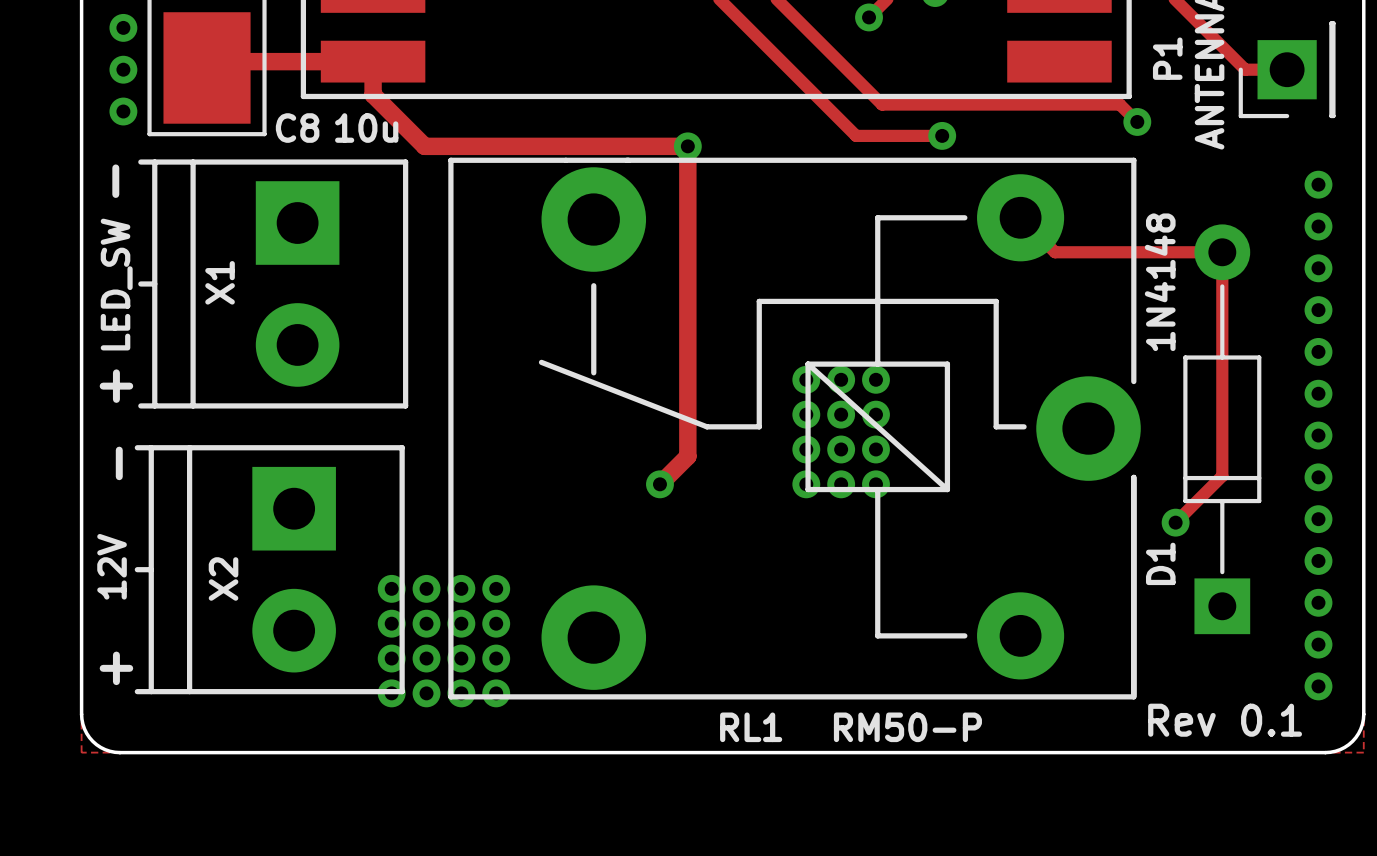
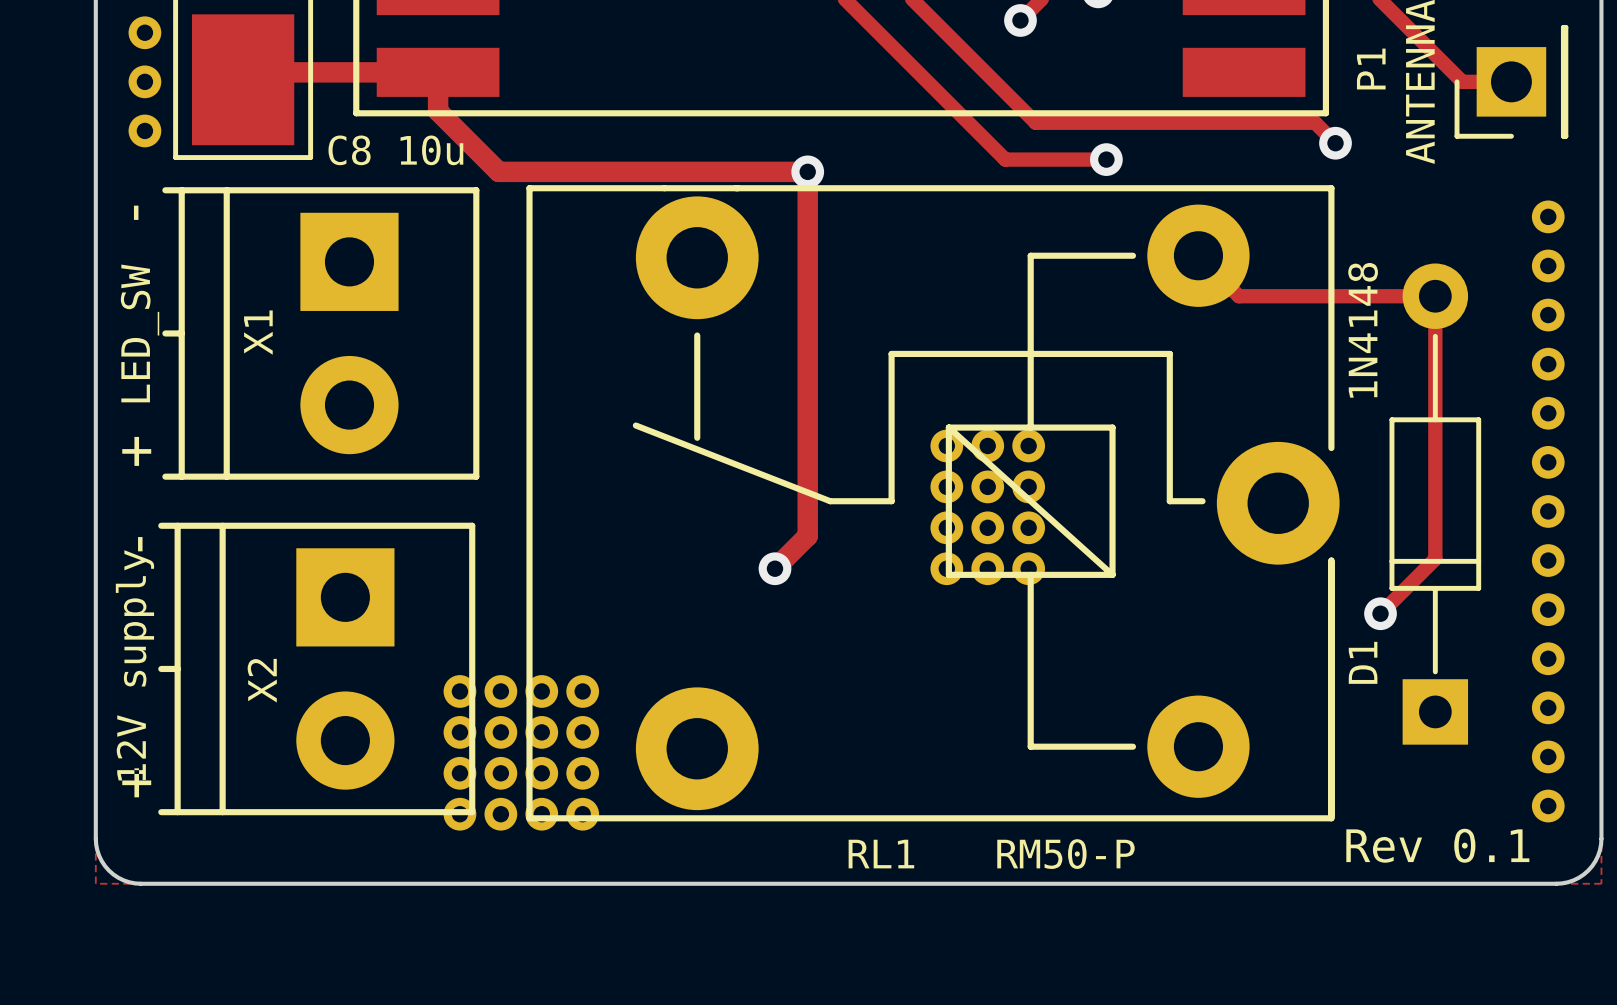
X2 value: 12V (112, 566) -> 12V supply (134, 665)

